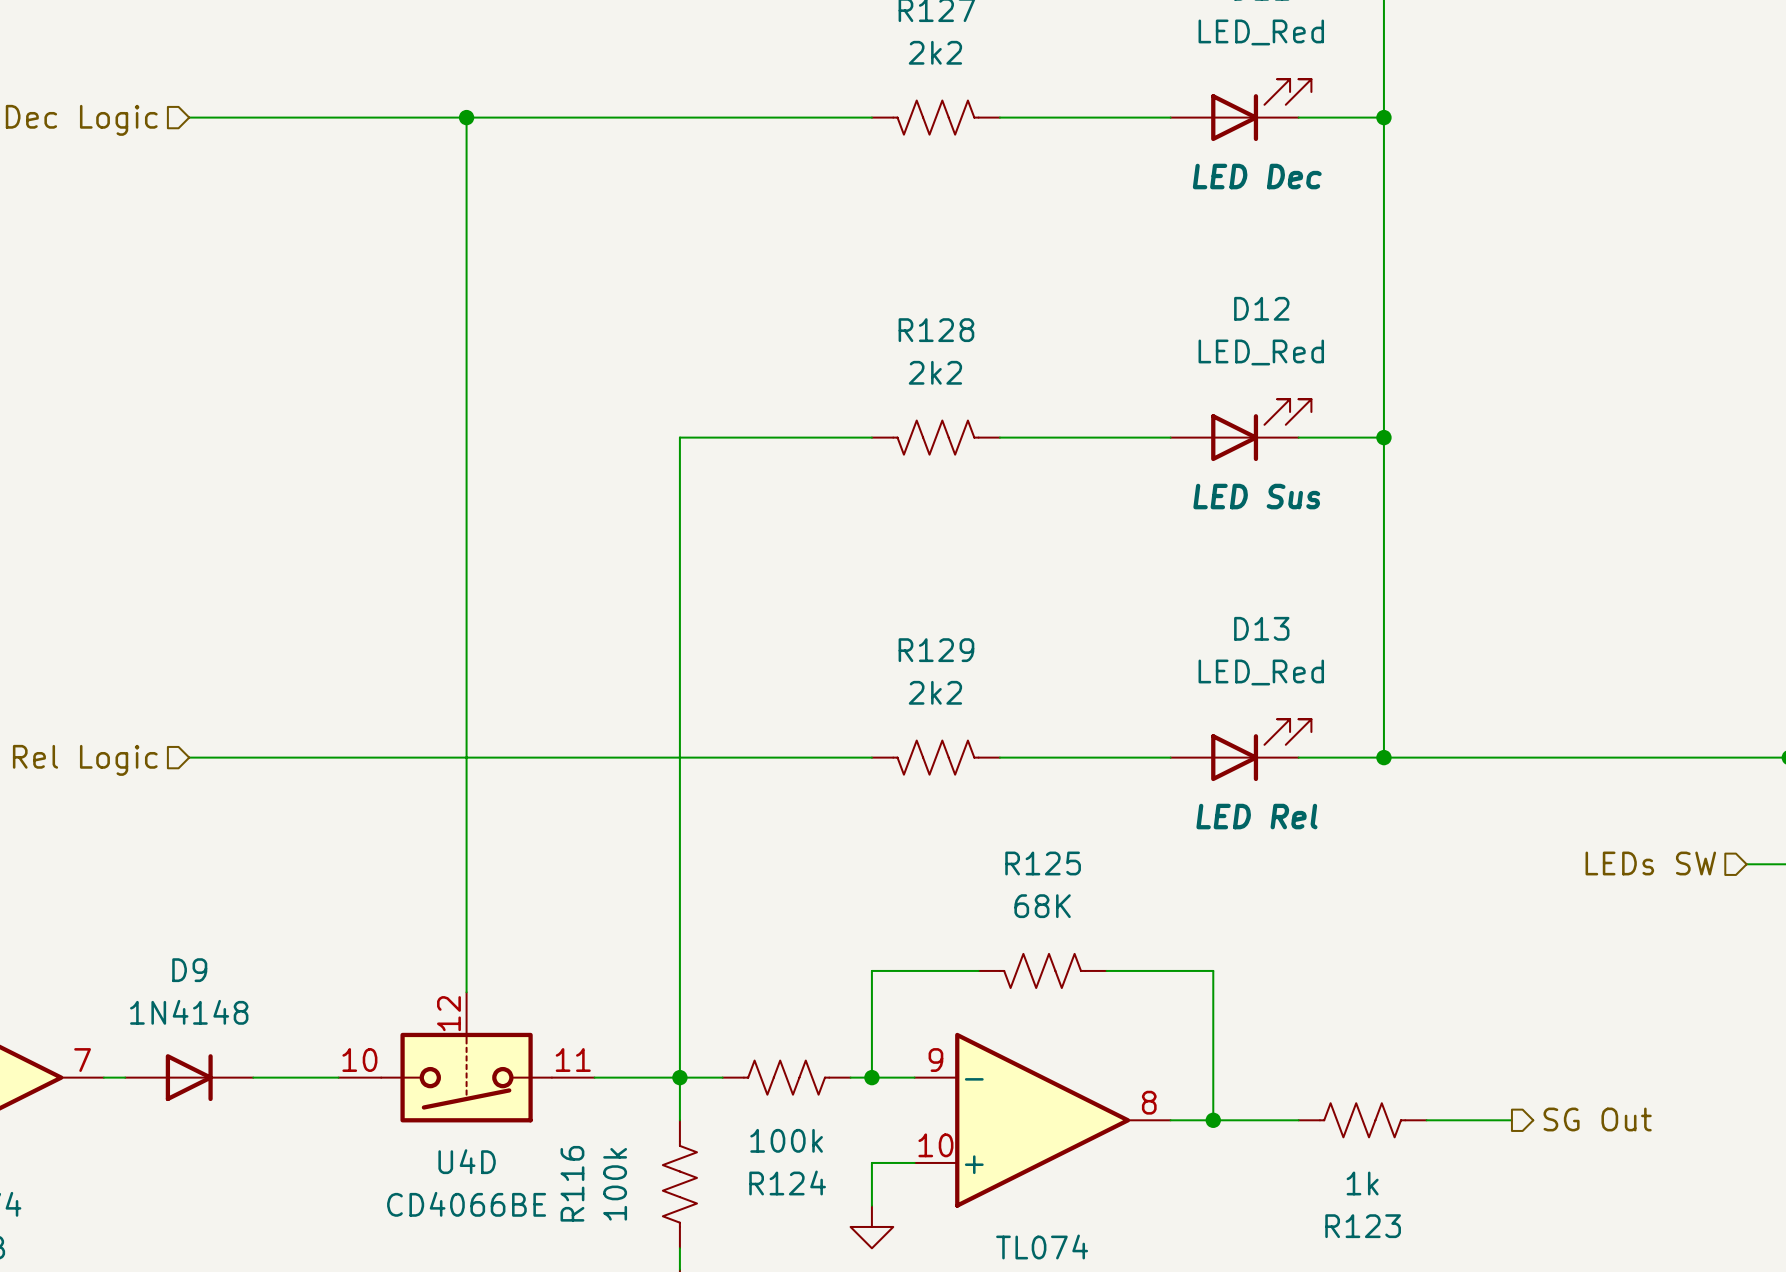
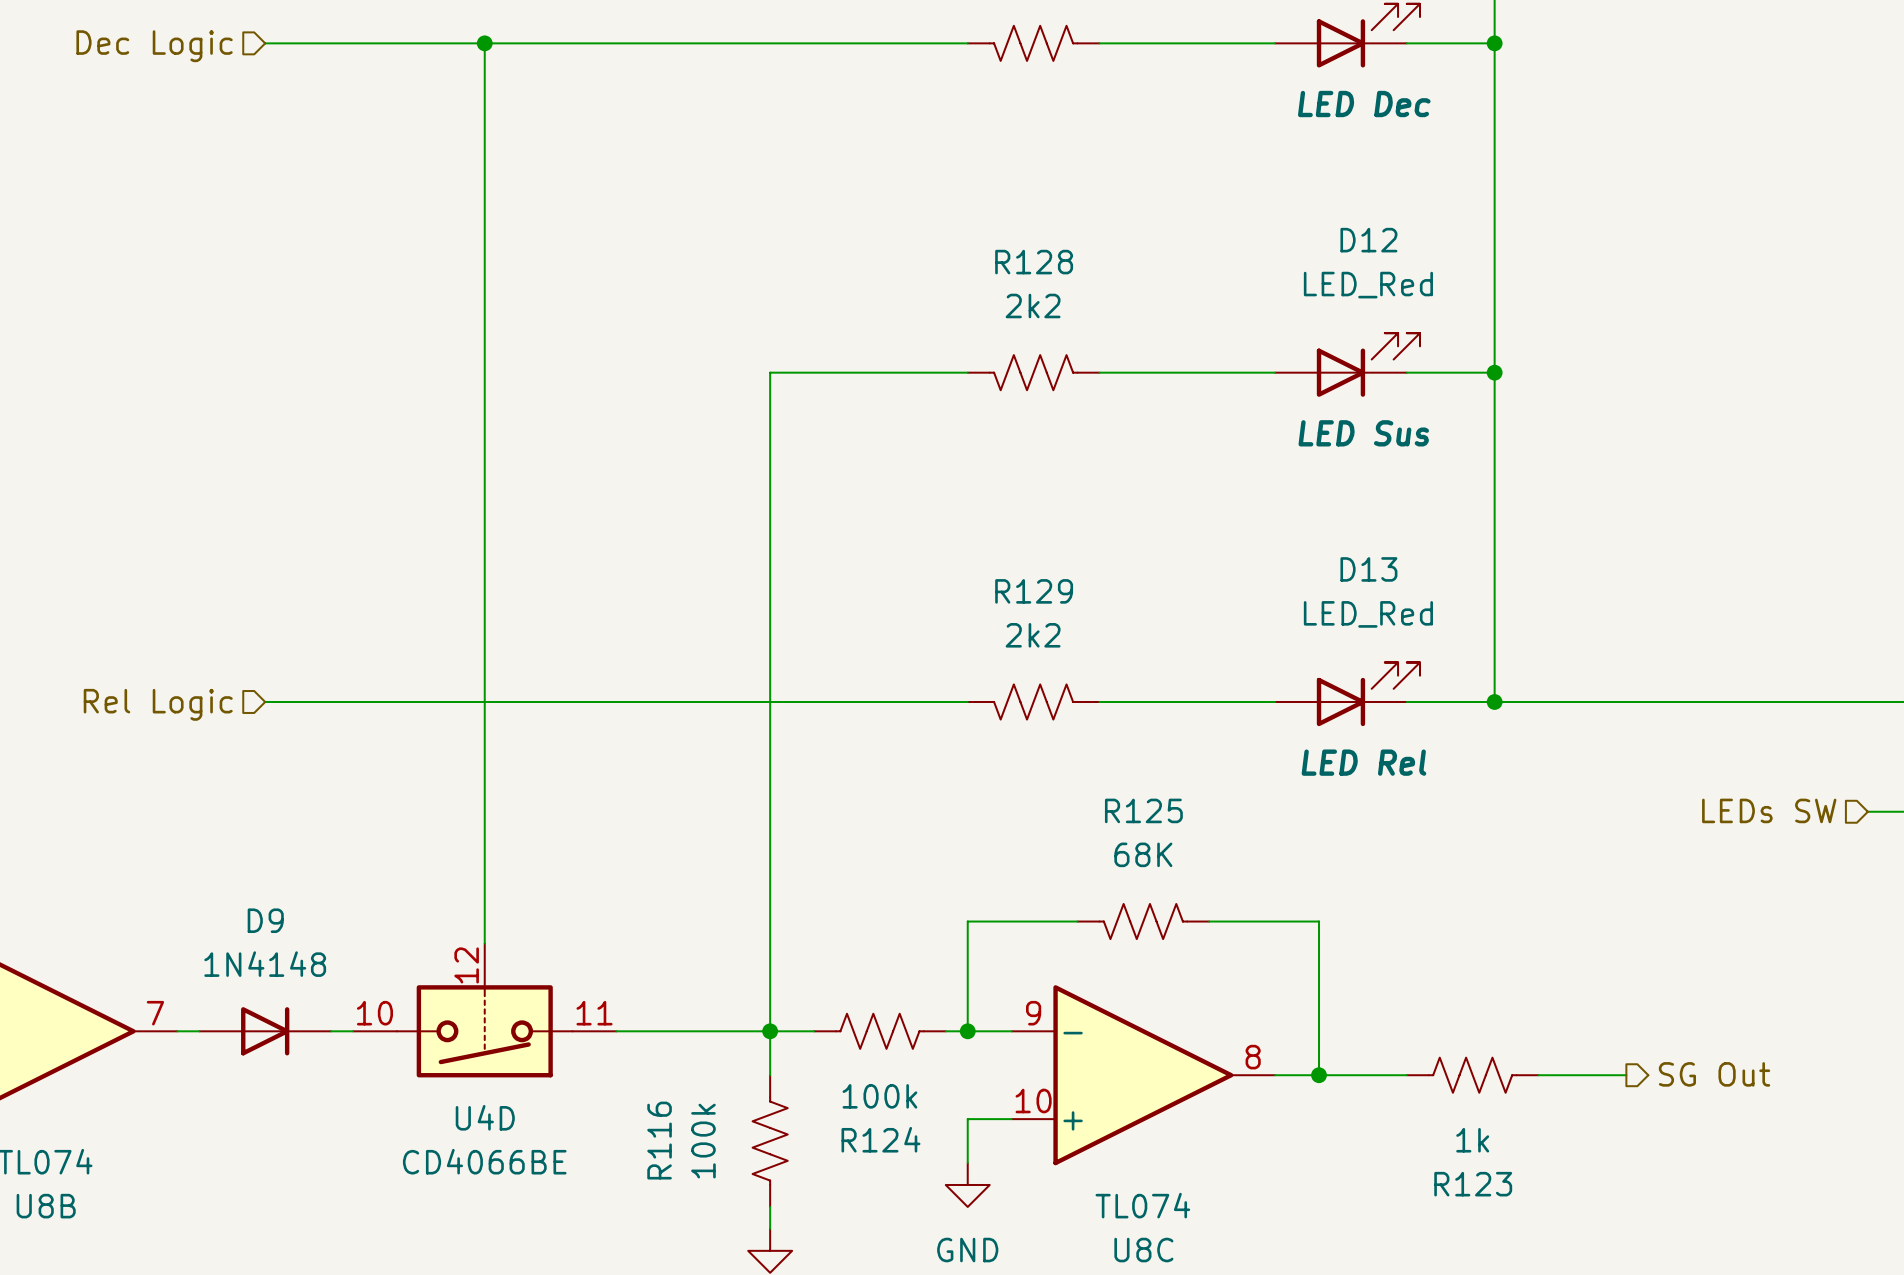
wire: (466, 117) (466, 992) -> (484, 43) (484, 943)
junction position: (466, 117) -> (484, 43)
U4D position: (466, 1057) -> (484, 1010)

